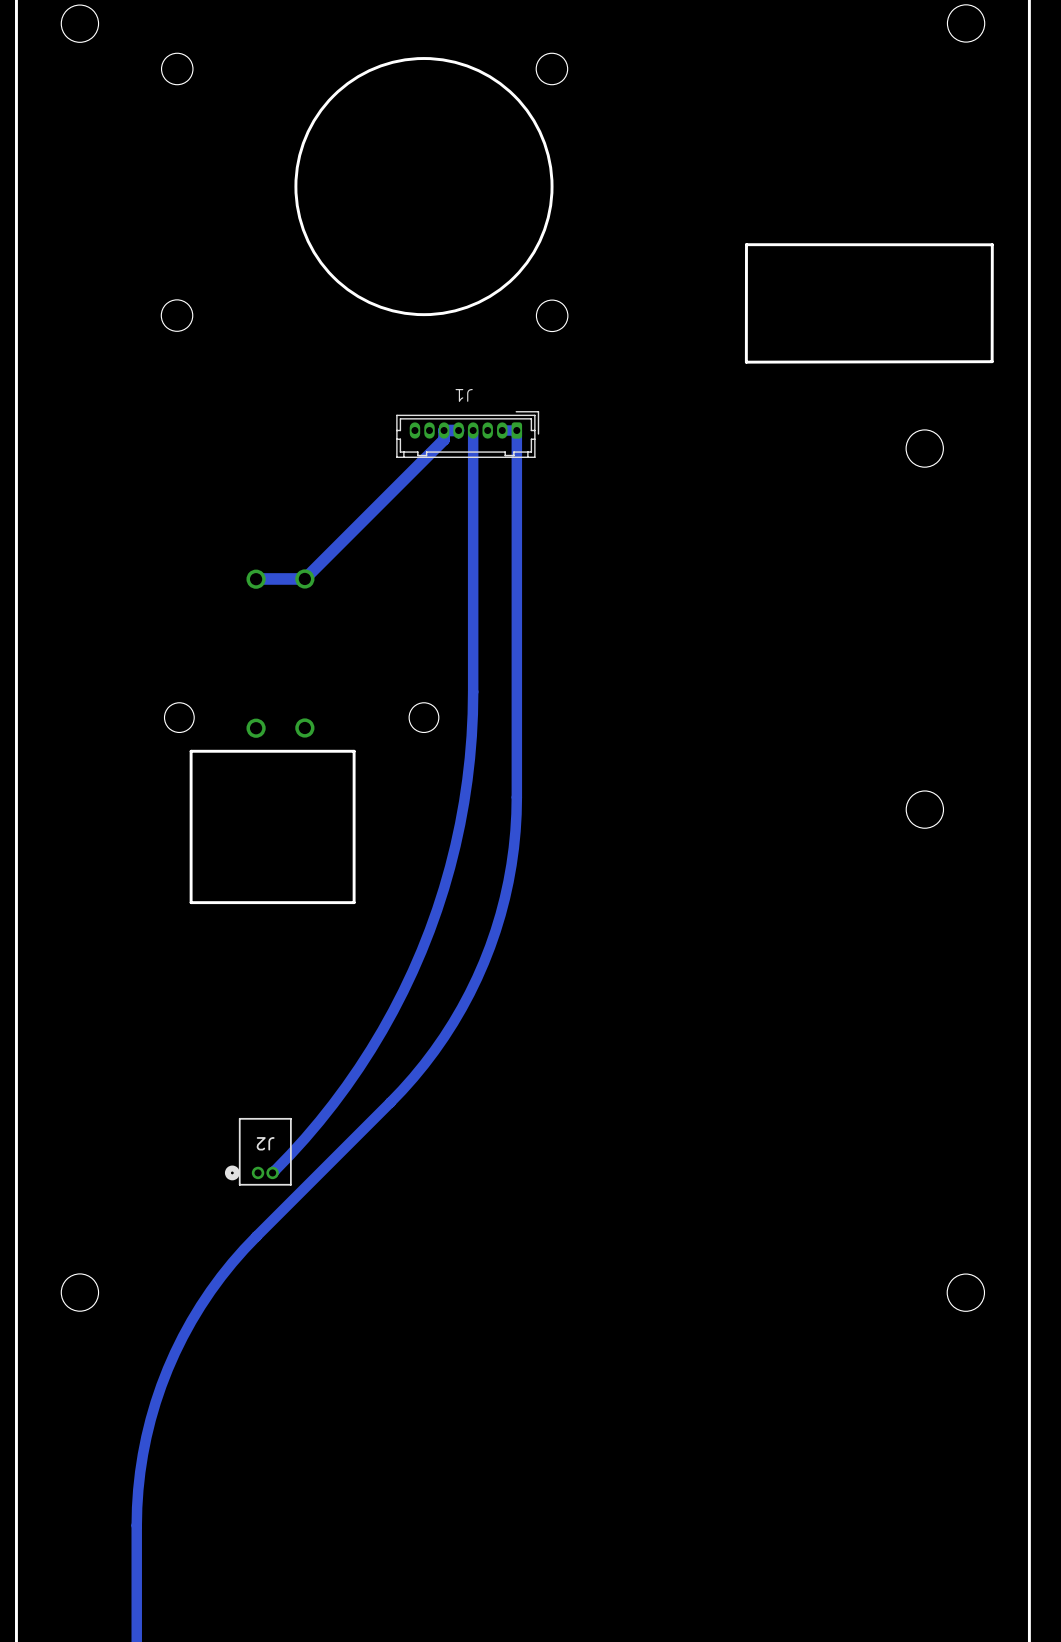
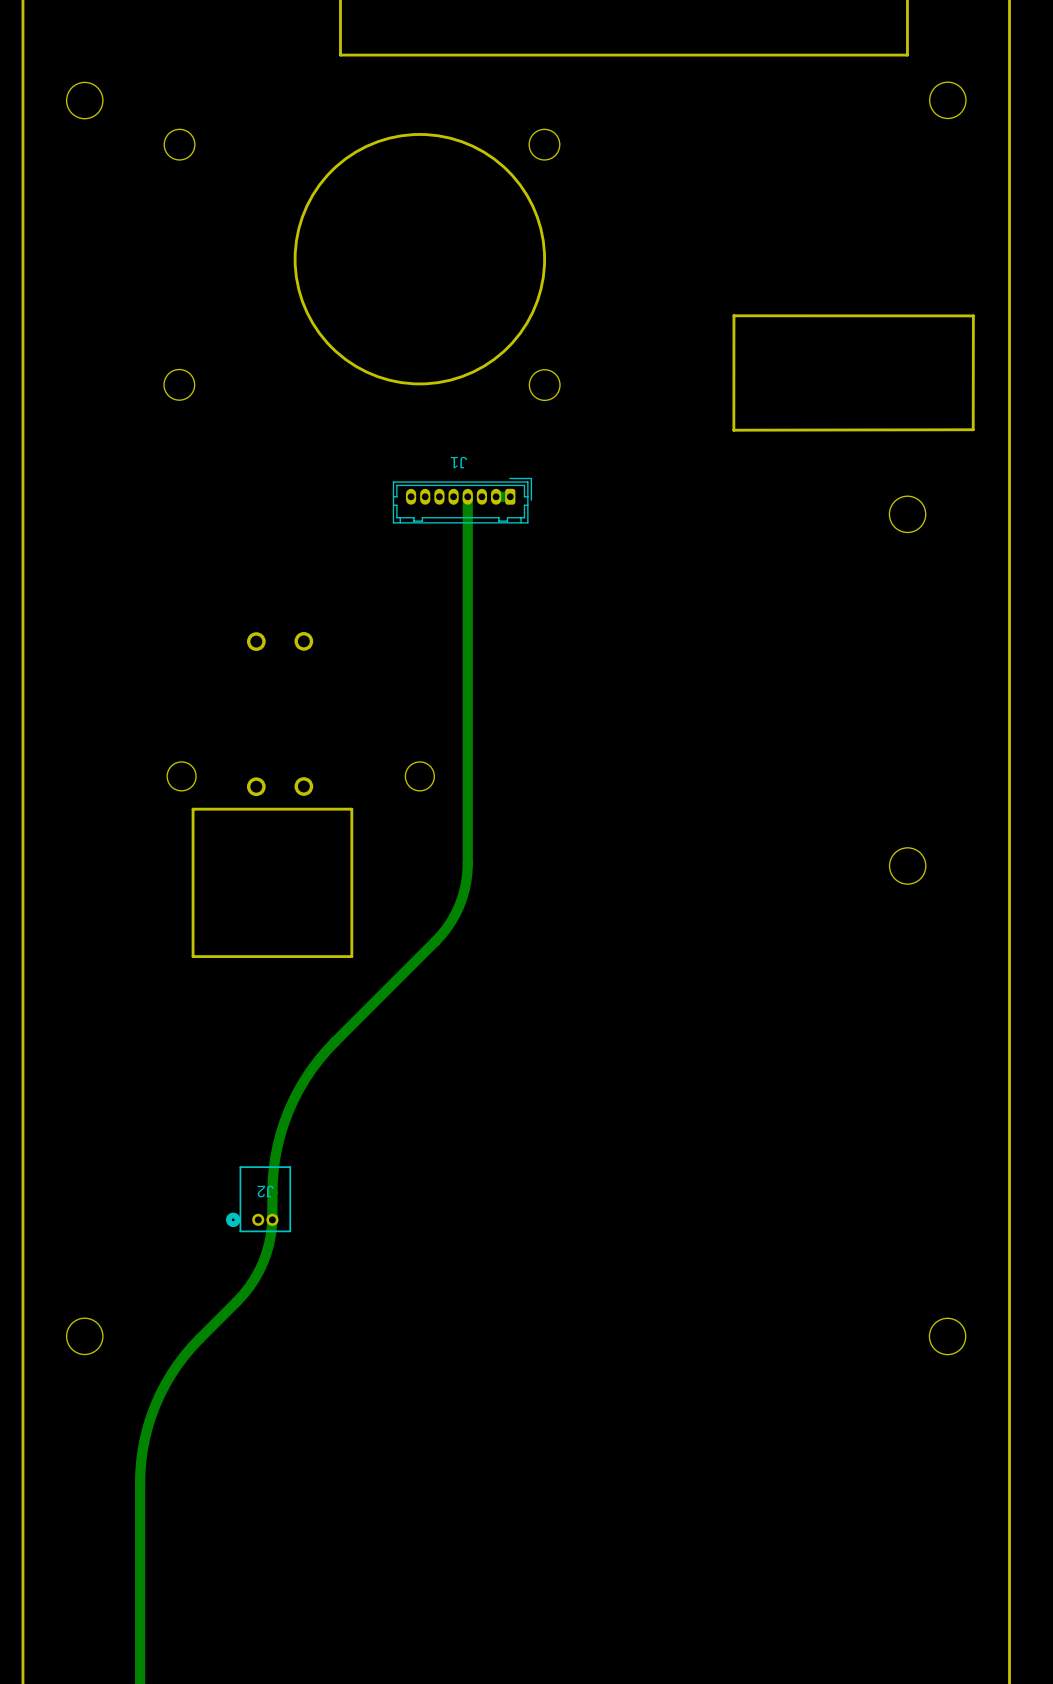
track: (458, 430) (444, 430) (444, 439) (304, 578) (256, 579) -> none
track: (516, 430) (516, 814) (508, 881) (490, 946) (461, 1008) (424, 1064) (390, 1102) (244, 1249) (221, 1276) (200, 1305) (175, 1352) (155, 1402) (146, 1437) (140, 1472) (136, 1525) -> (467, 751) (467, 872) (459, 905) (441, 934) (326, 1050) (305, 1079) (293, 1100) (284, 1122) (275, 1157) (272, 1225) (263, 1262) (243, 1294) (191, 1347) (177, 1364) (160, 1394) (151, 1415) (142, 1448) (140, 1471) (140, 1563)
track: (473, 691) (469, 758) (460, 824) (444, 888) (421, 951) (393, 1011) (359, 1068) (319, 1121) (272, 1172) -> none

